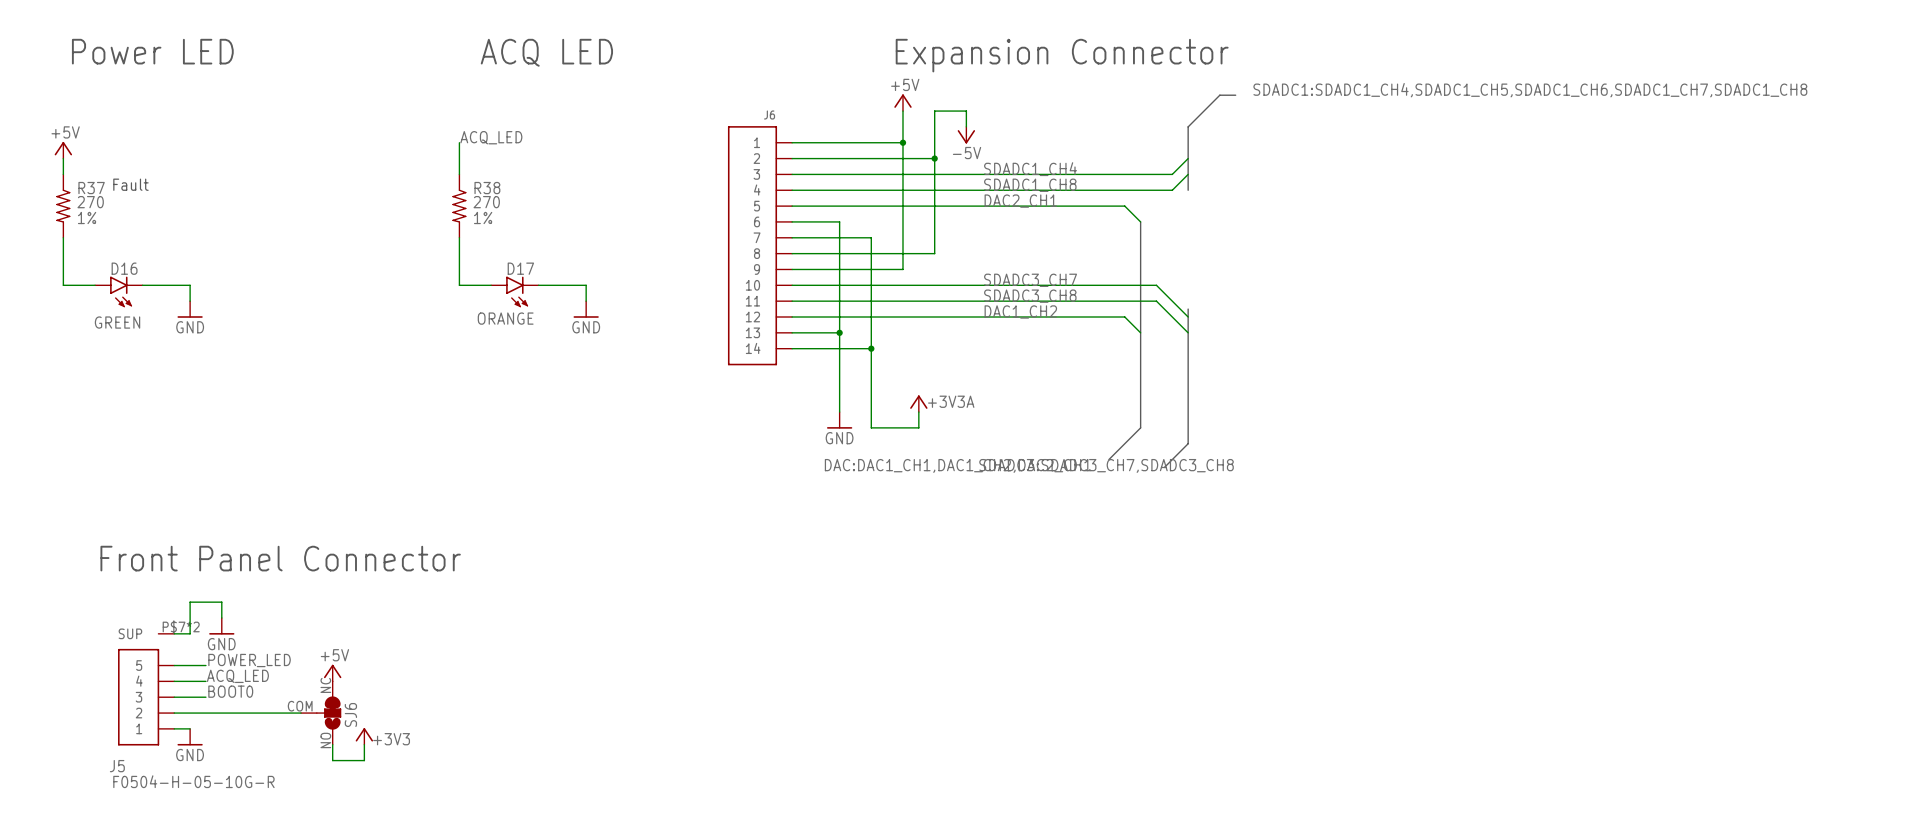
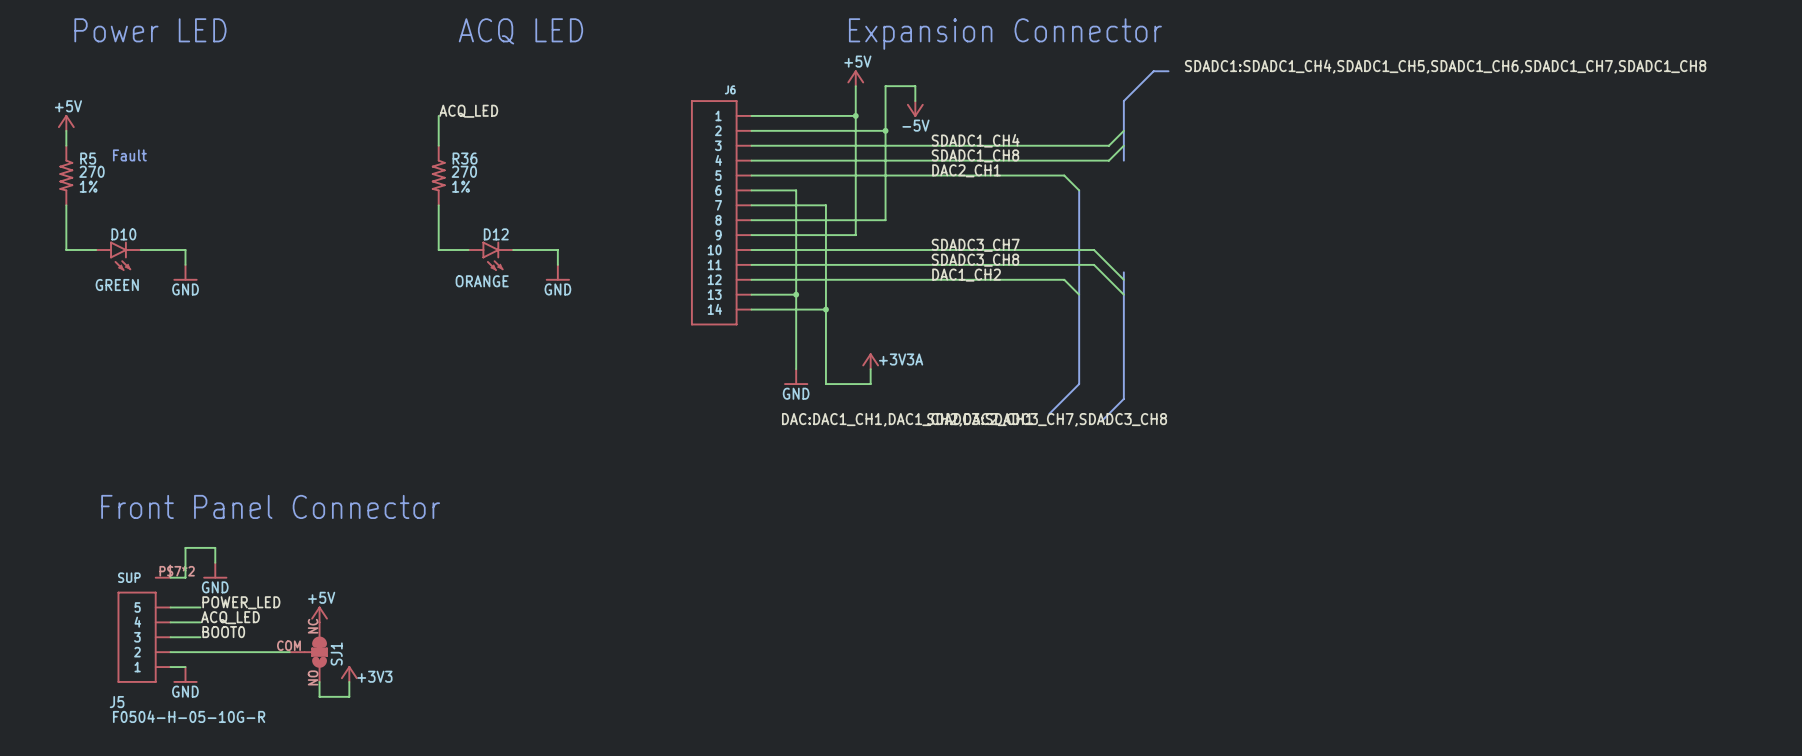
R37 name: R37 (91, 188) -> R5 (88, 158)
R38 name: R38 (487, 188) -> R36 (465, 158)
D16 name: D16 (124, 268) -> D10 (123, 234)
D17 name: D17 (520, 268) -> D12 (496, 234)
SJ6 name: SJ6 (350, 715) -> SJ1 (336, 653)

